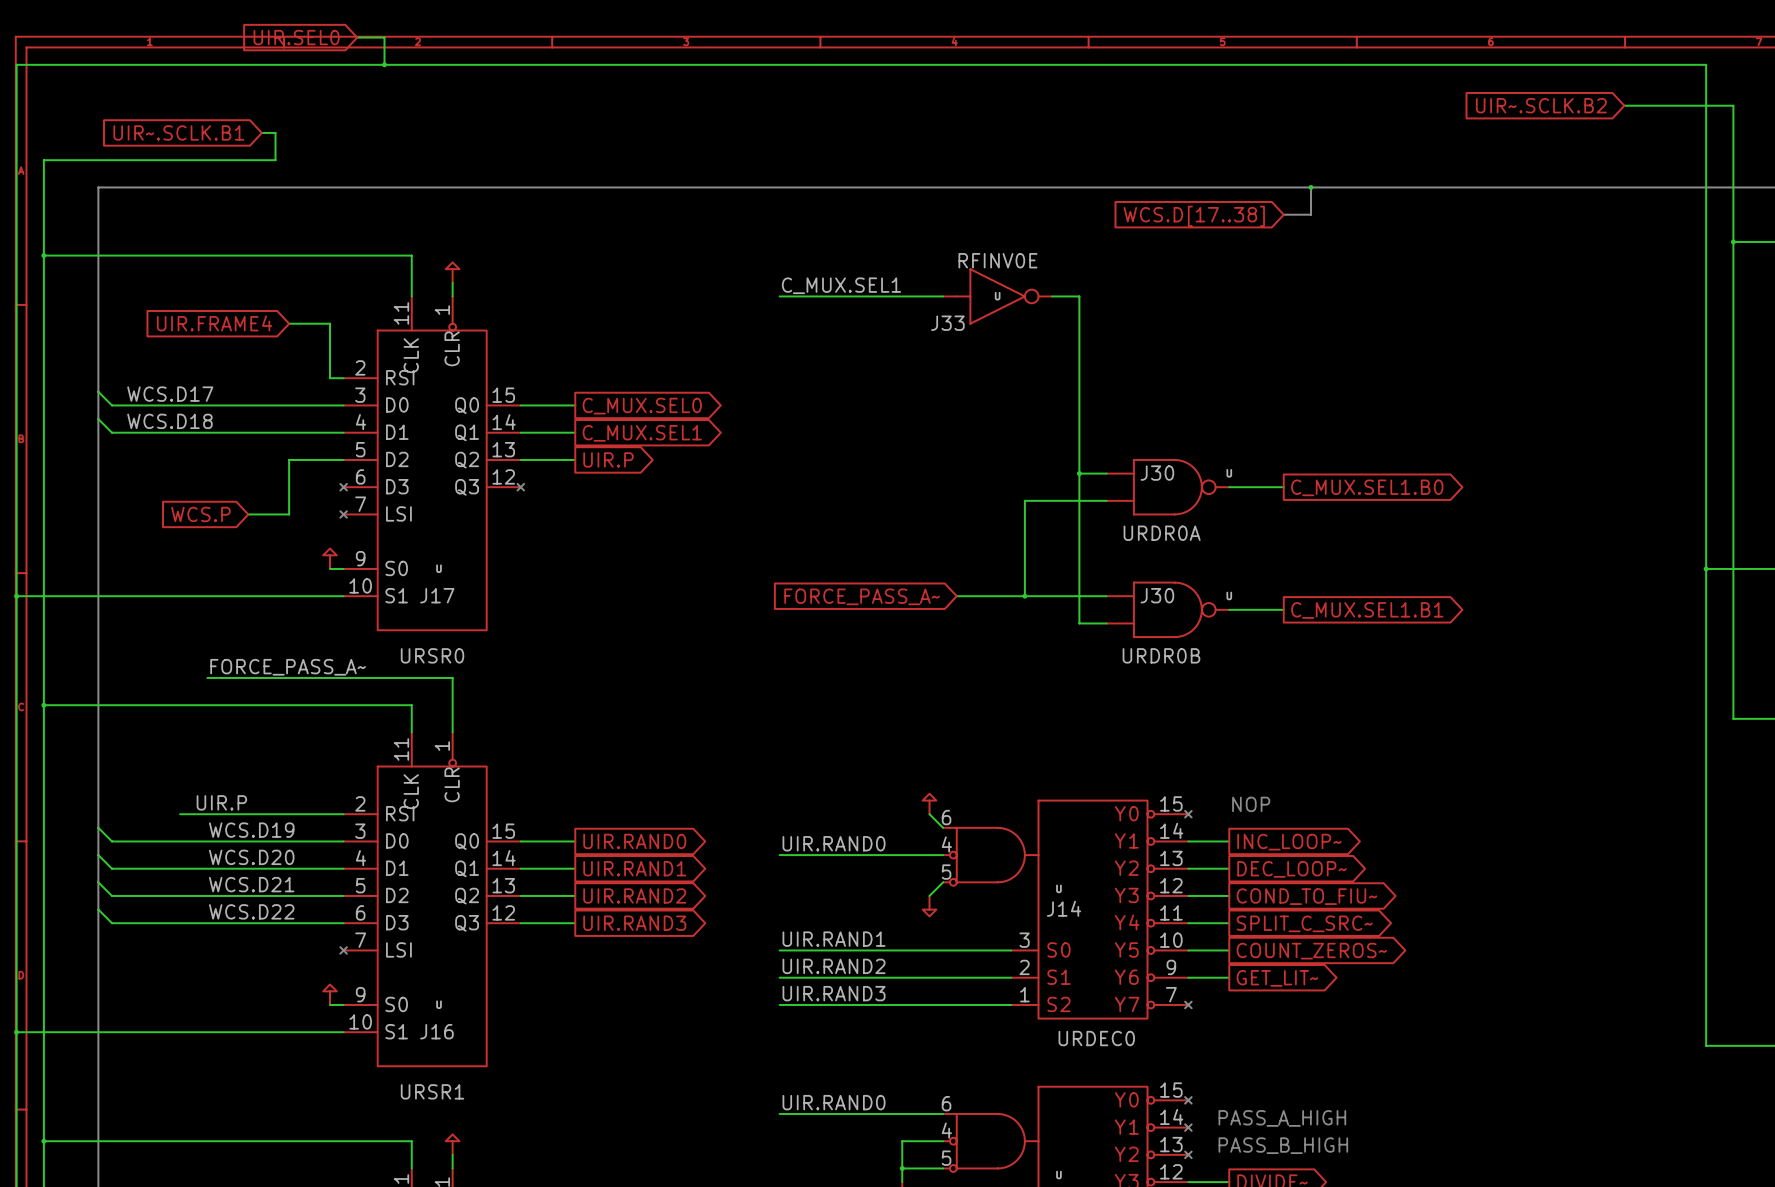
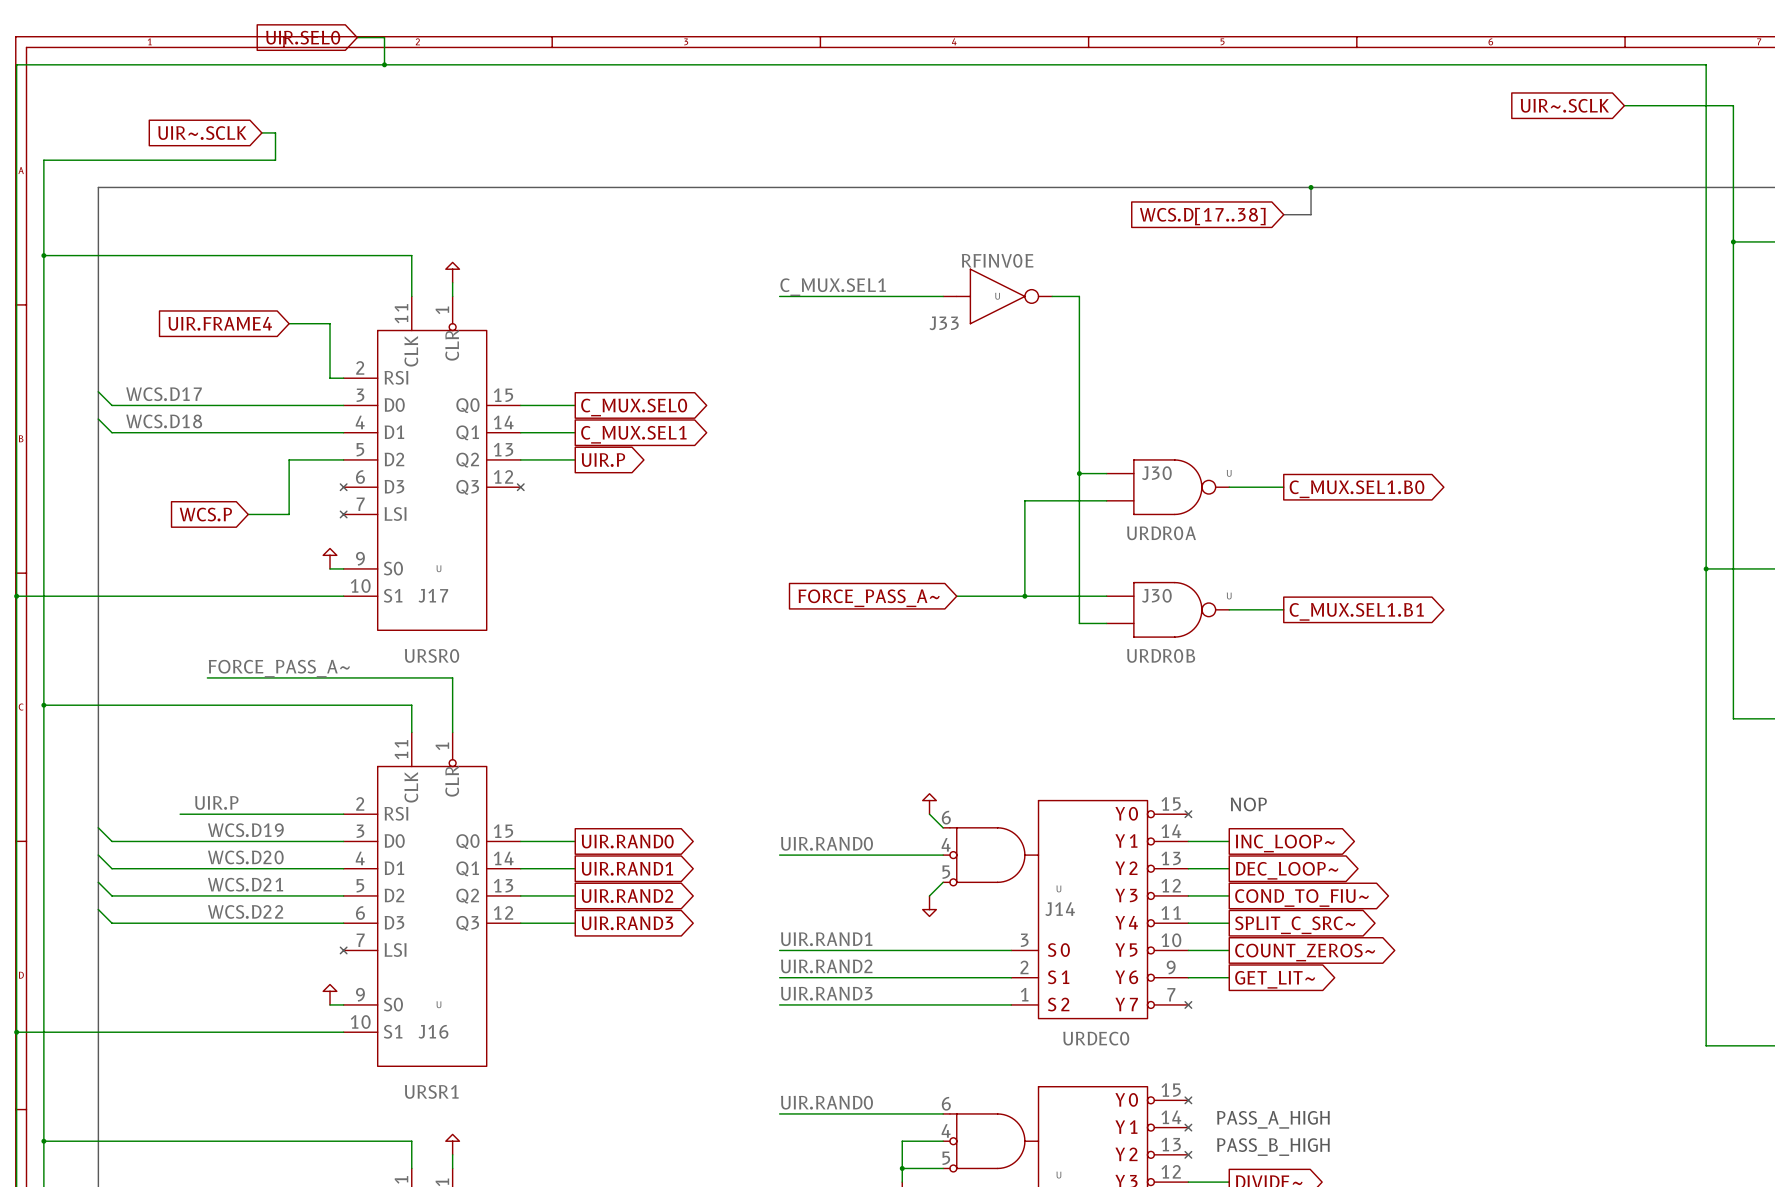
global label: UIR~.SCLK.B2 (1541, 105) -> UIR~.SCLK (1564, 105)
global label: UIR~.SCLK.B1 (178, 132) -> UIR~.SCLK (202, 133)

